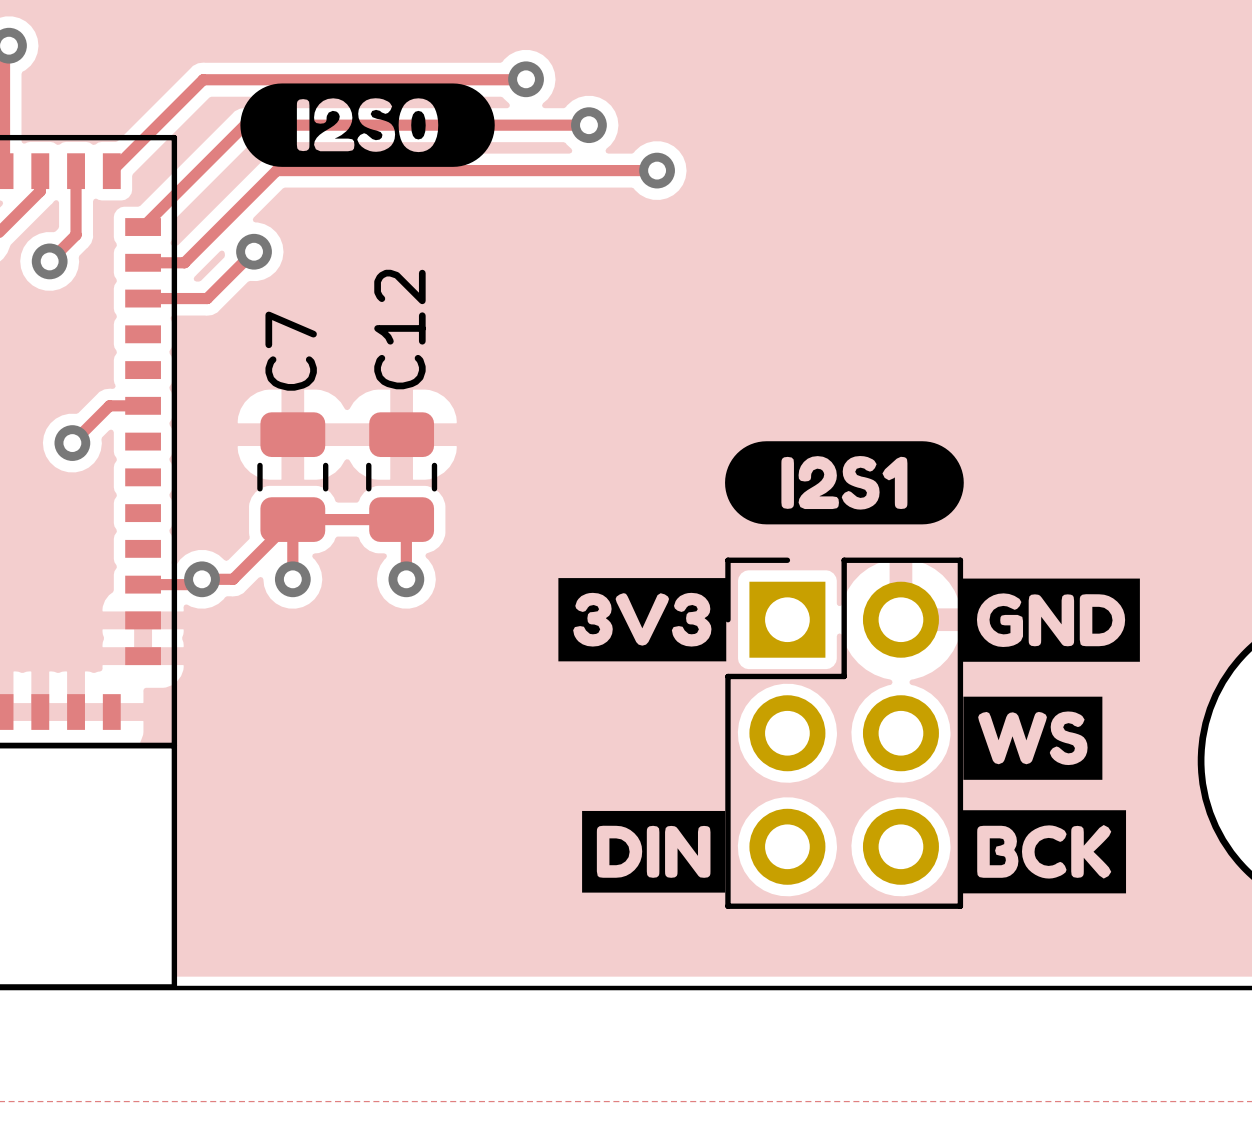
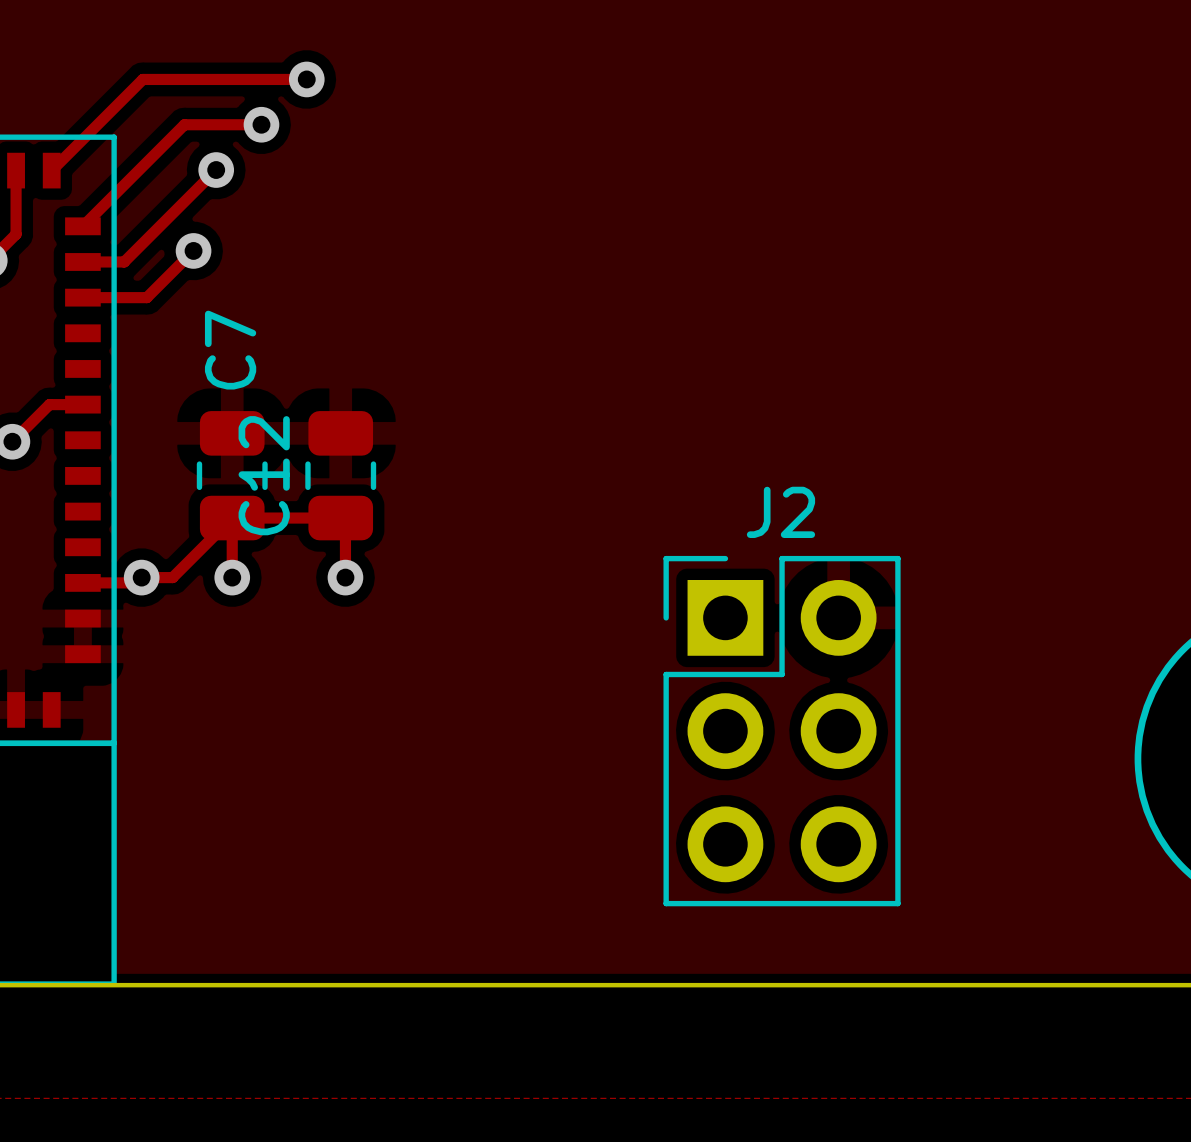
track: (367, 79) (525, 79) -> none
via: none -> (306, 79)
via: (526, 79) -> none
drawing: [240, 83, 495, 167] -> none
track: (322, 125) (588, 125) -> none
via: none -> (261, 124)
via: (588, 125) -> none
track: (276, 170) (657, 170) -> none
via: none -> (216, 170)
via: (657, 170) -> none
C12 name position: C12 (399, 329) -> C12 (264, 475)
drawing: [725, 441, 964, 525] -> none
J2 name: none -> J2 (780, 512)
drawing: [558, 578, 727, 662] -> none
drawing: [962, 578, 1140, 894] -> none
drawing: [582, 810, 726, 893] -> none

